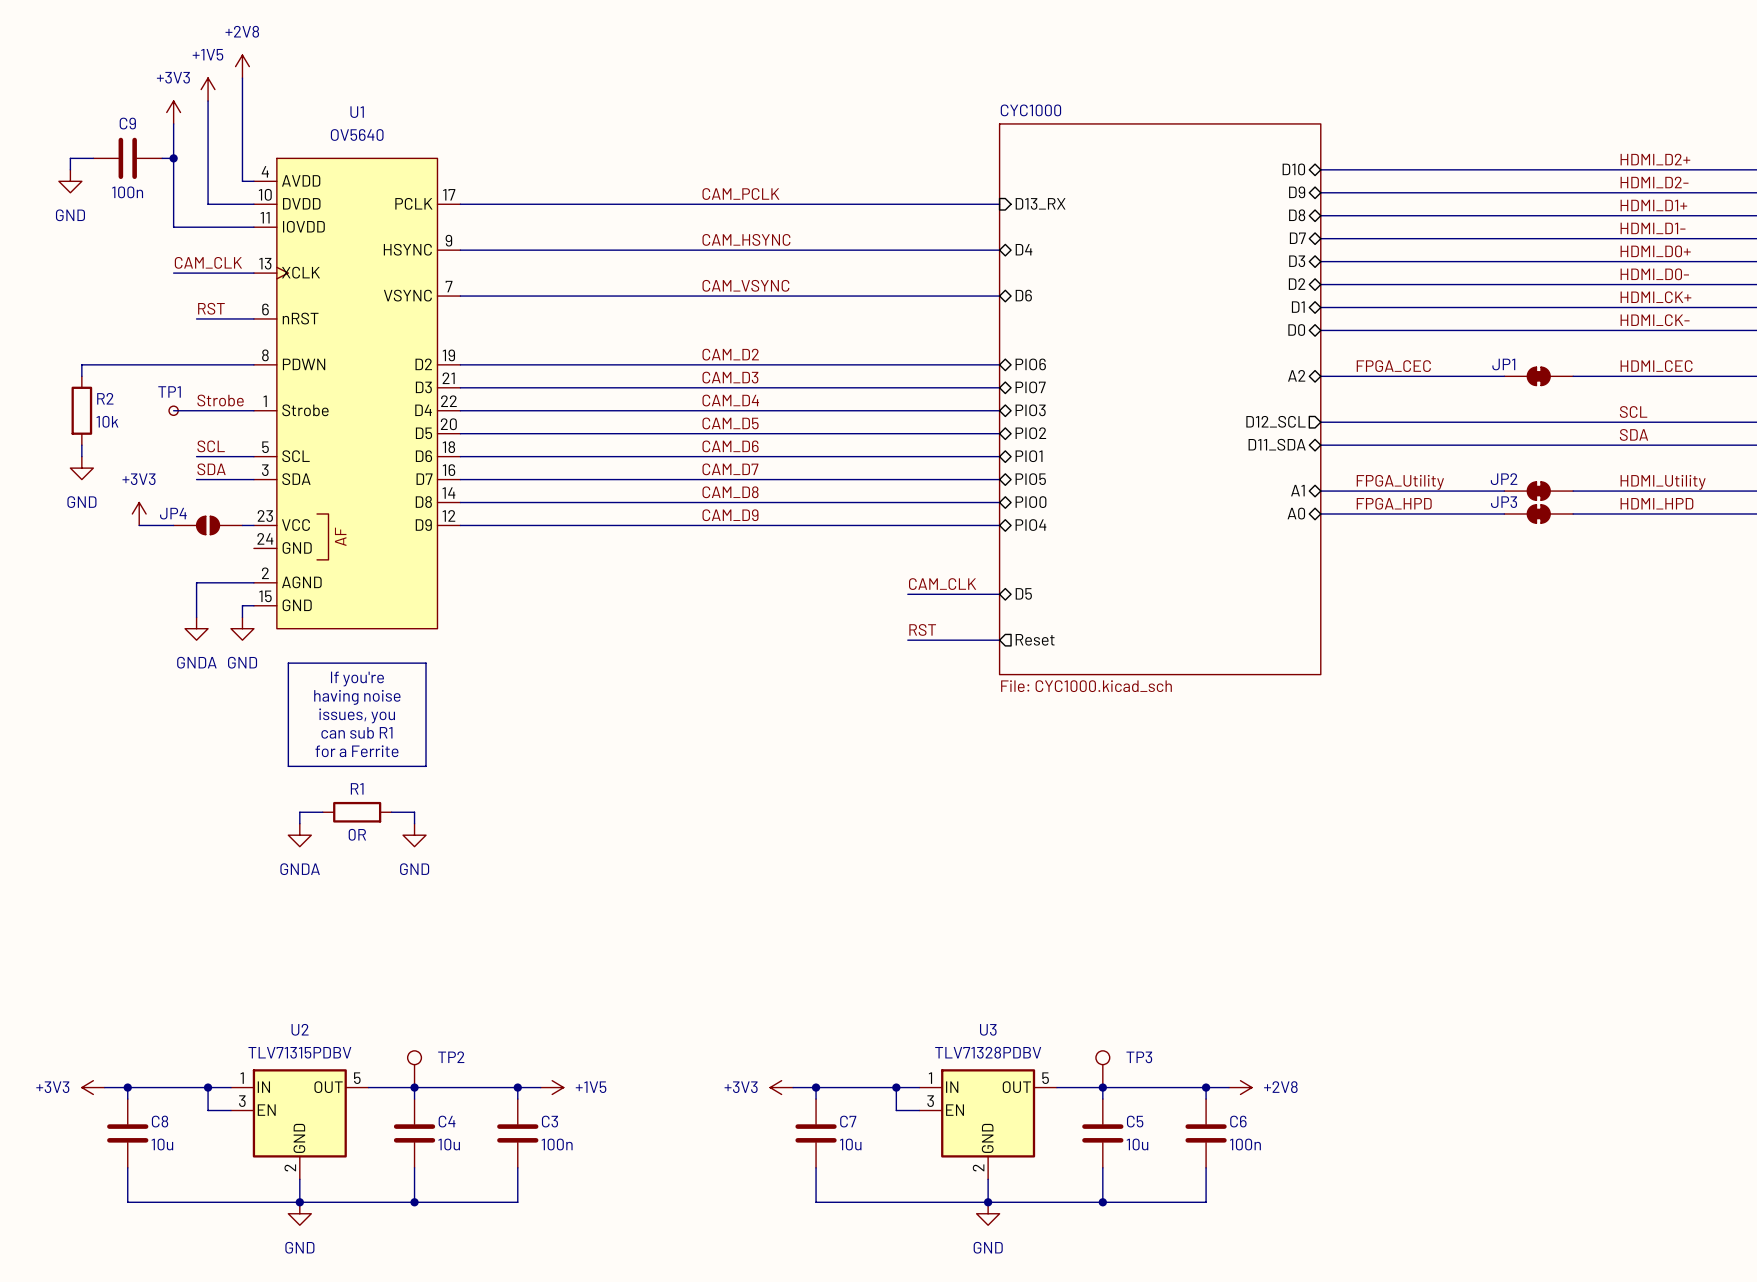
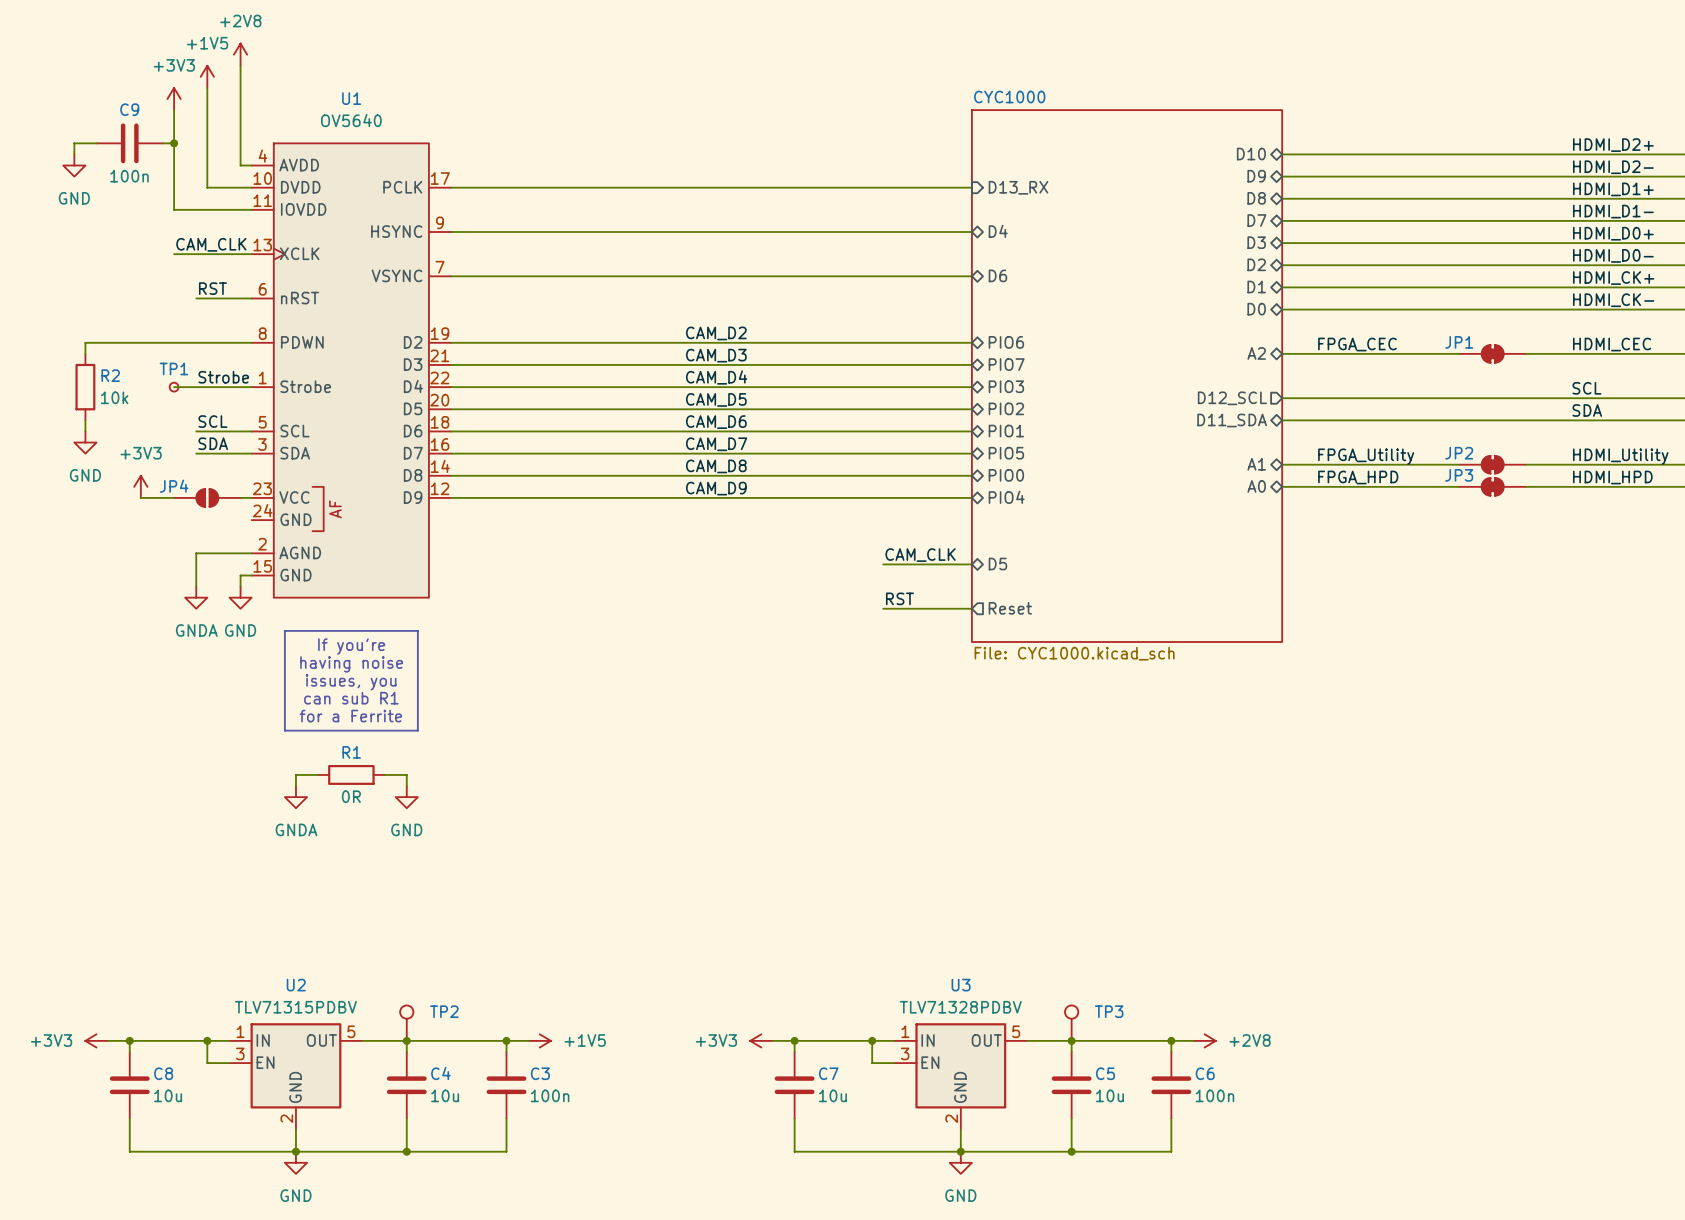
label: CAM_PCLK (740, 194) -> none
label: CAM_HSYNC (746, 239) -> none
label: CAM_VSYNC (745, 285) -> none

